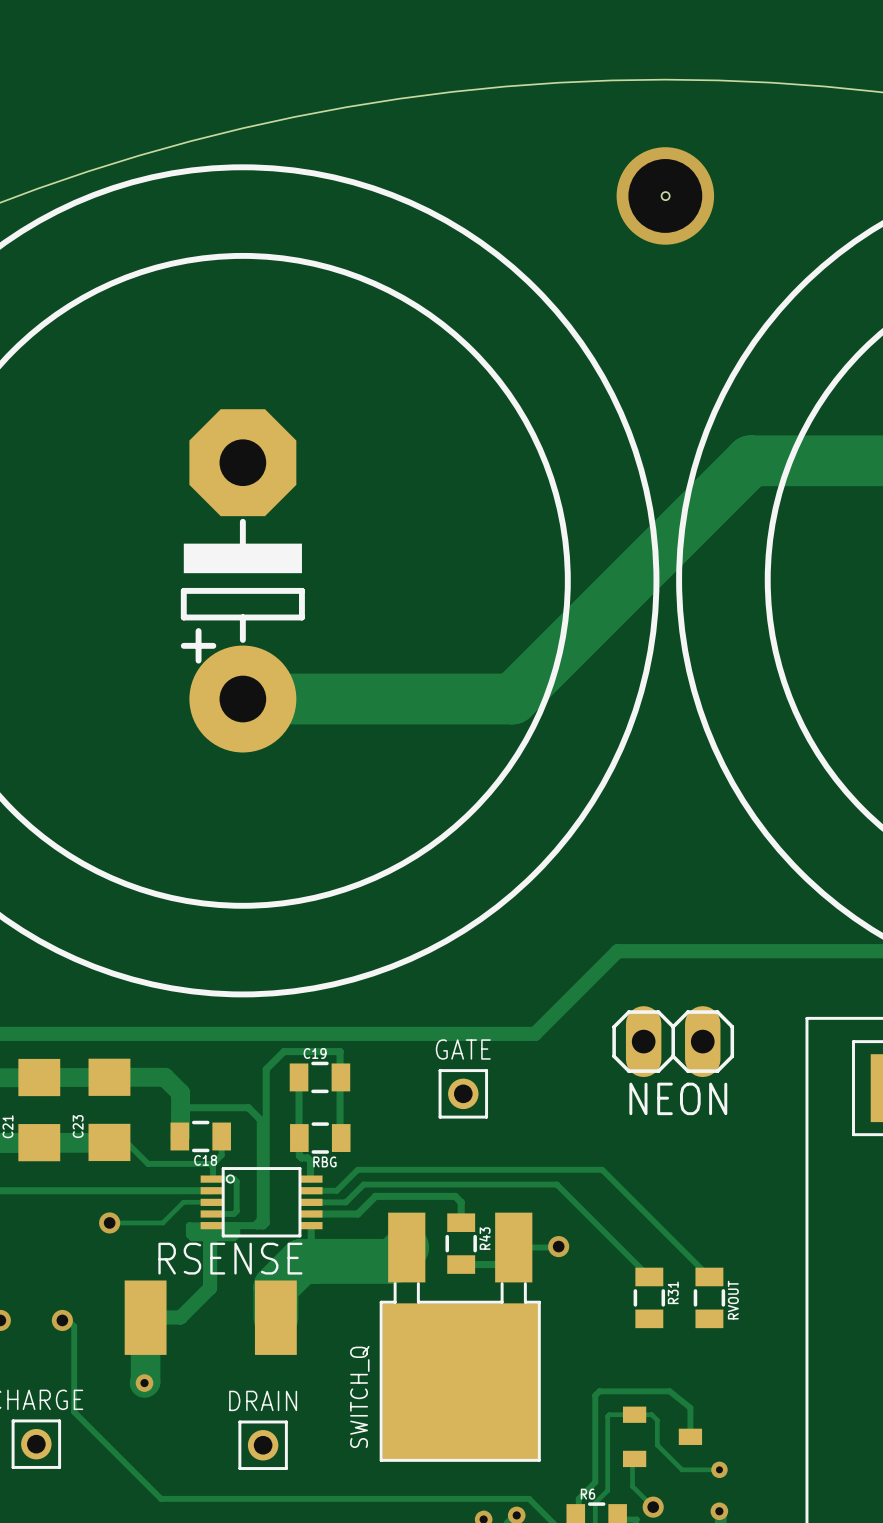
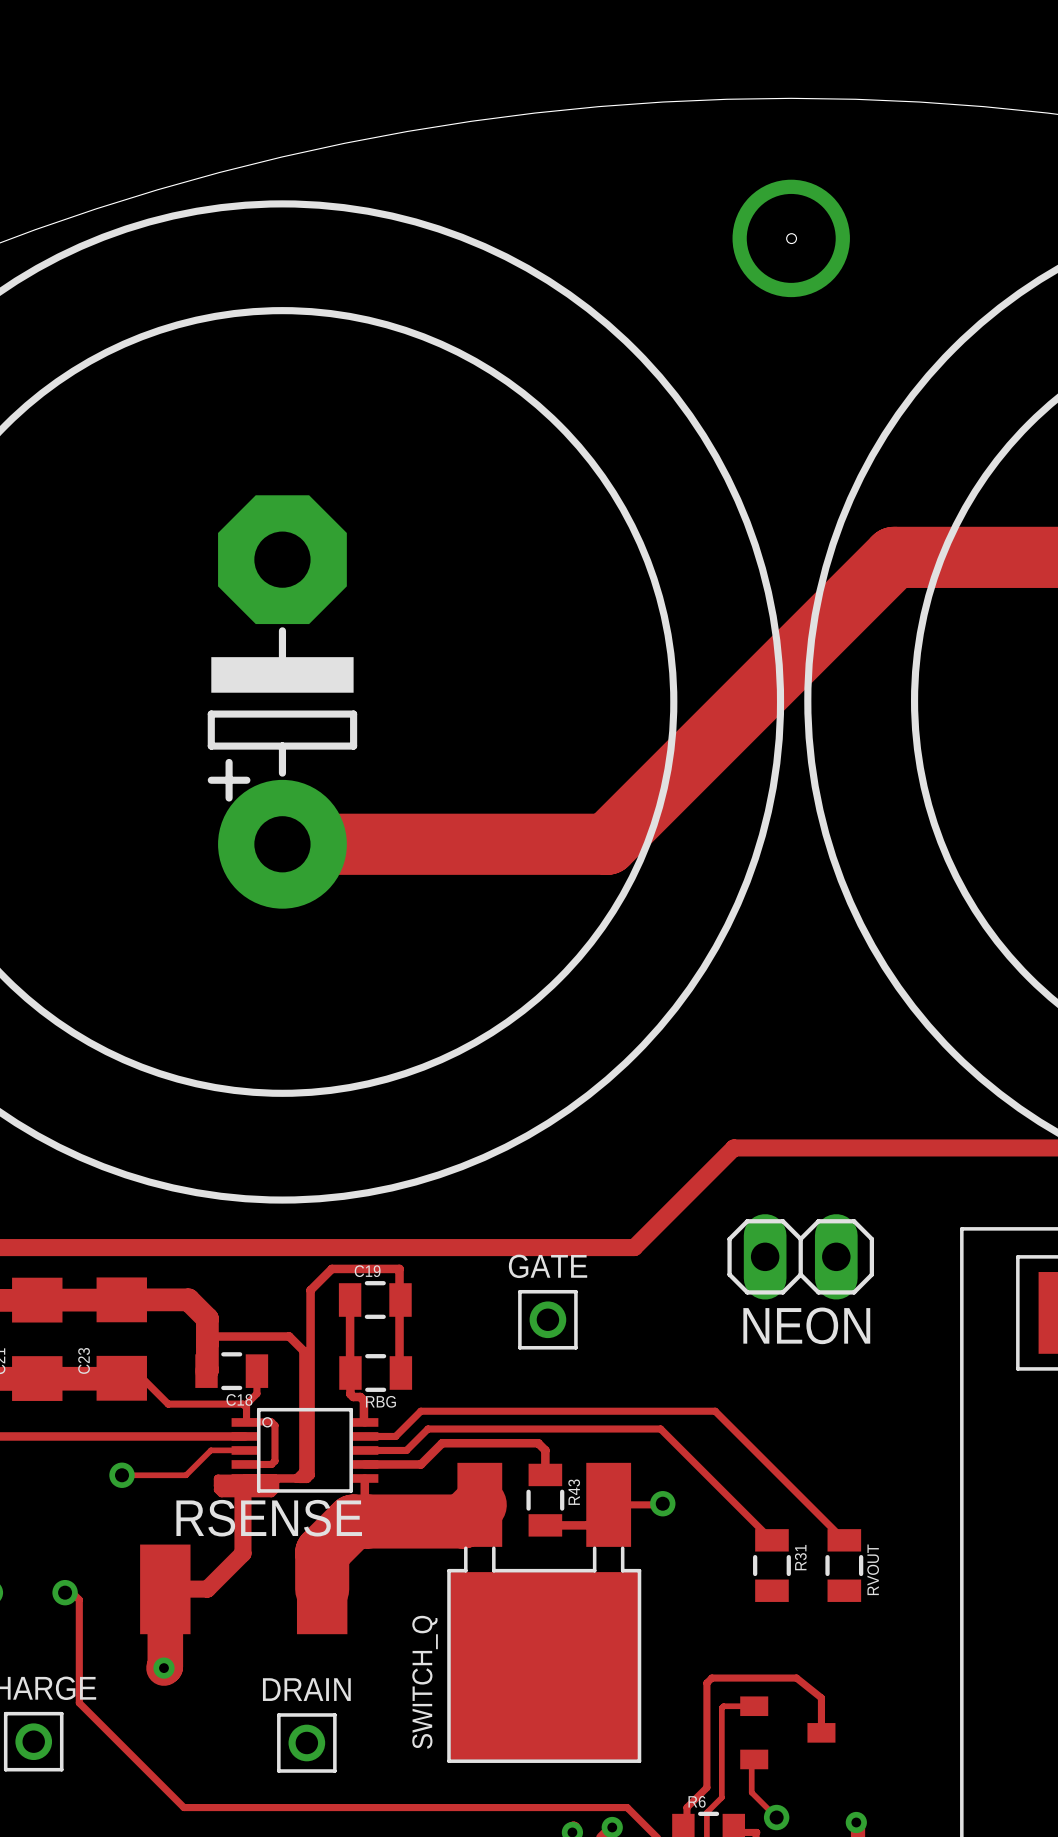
track: (634, 1414) (651, 1414) (657, 1420) (657, 1445) (682, 1469) (719, 1469) -> none
via: (719, 1469) -> none

